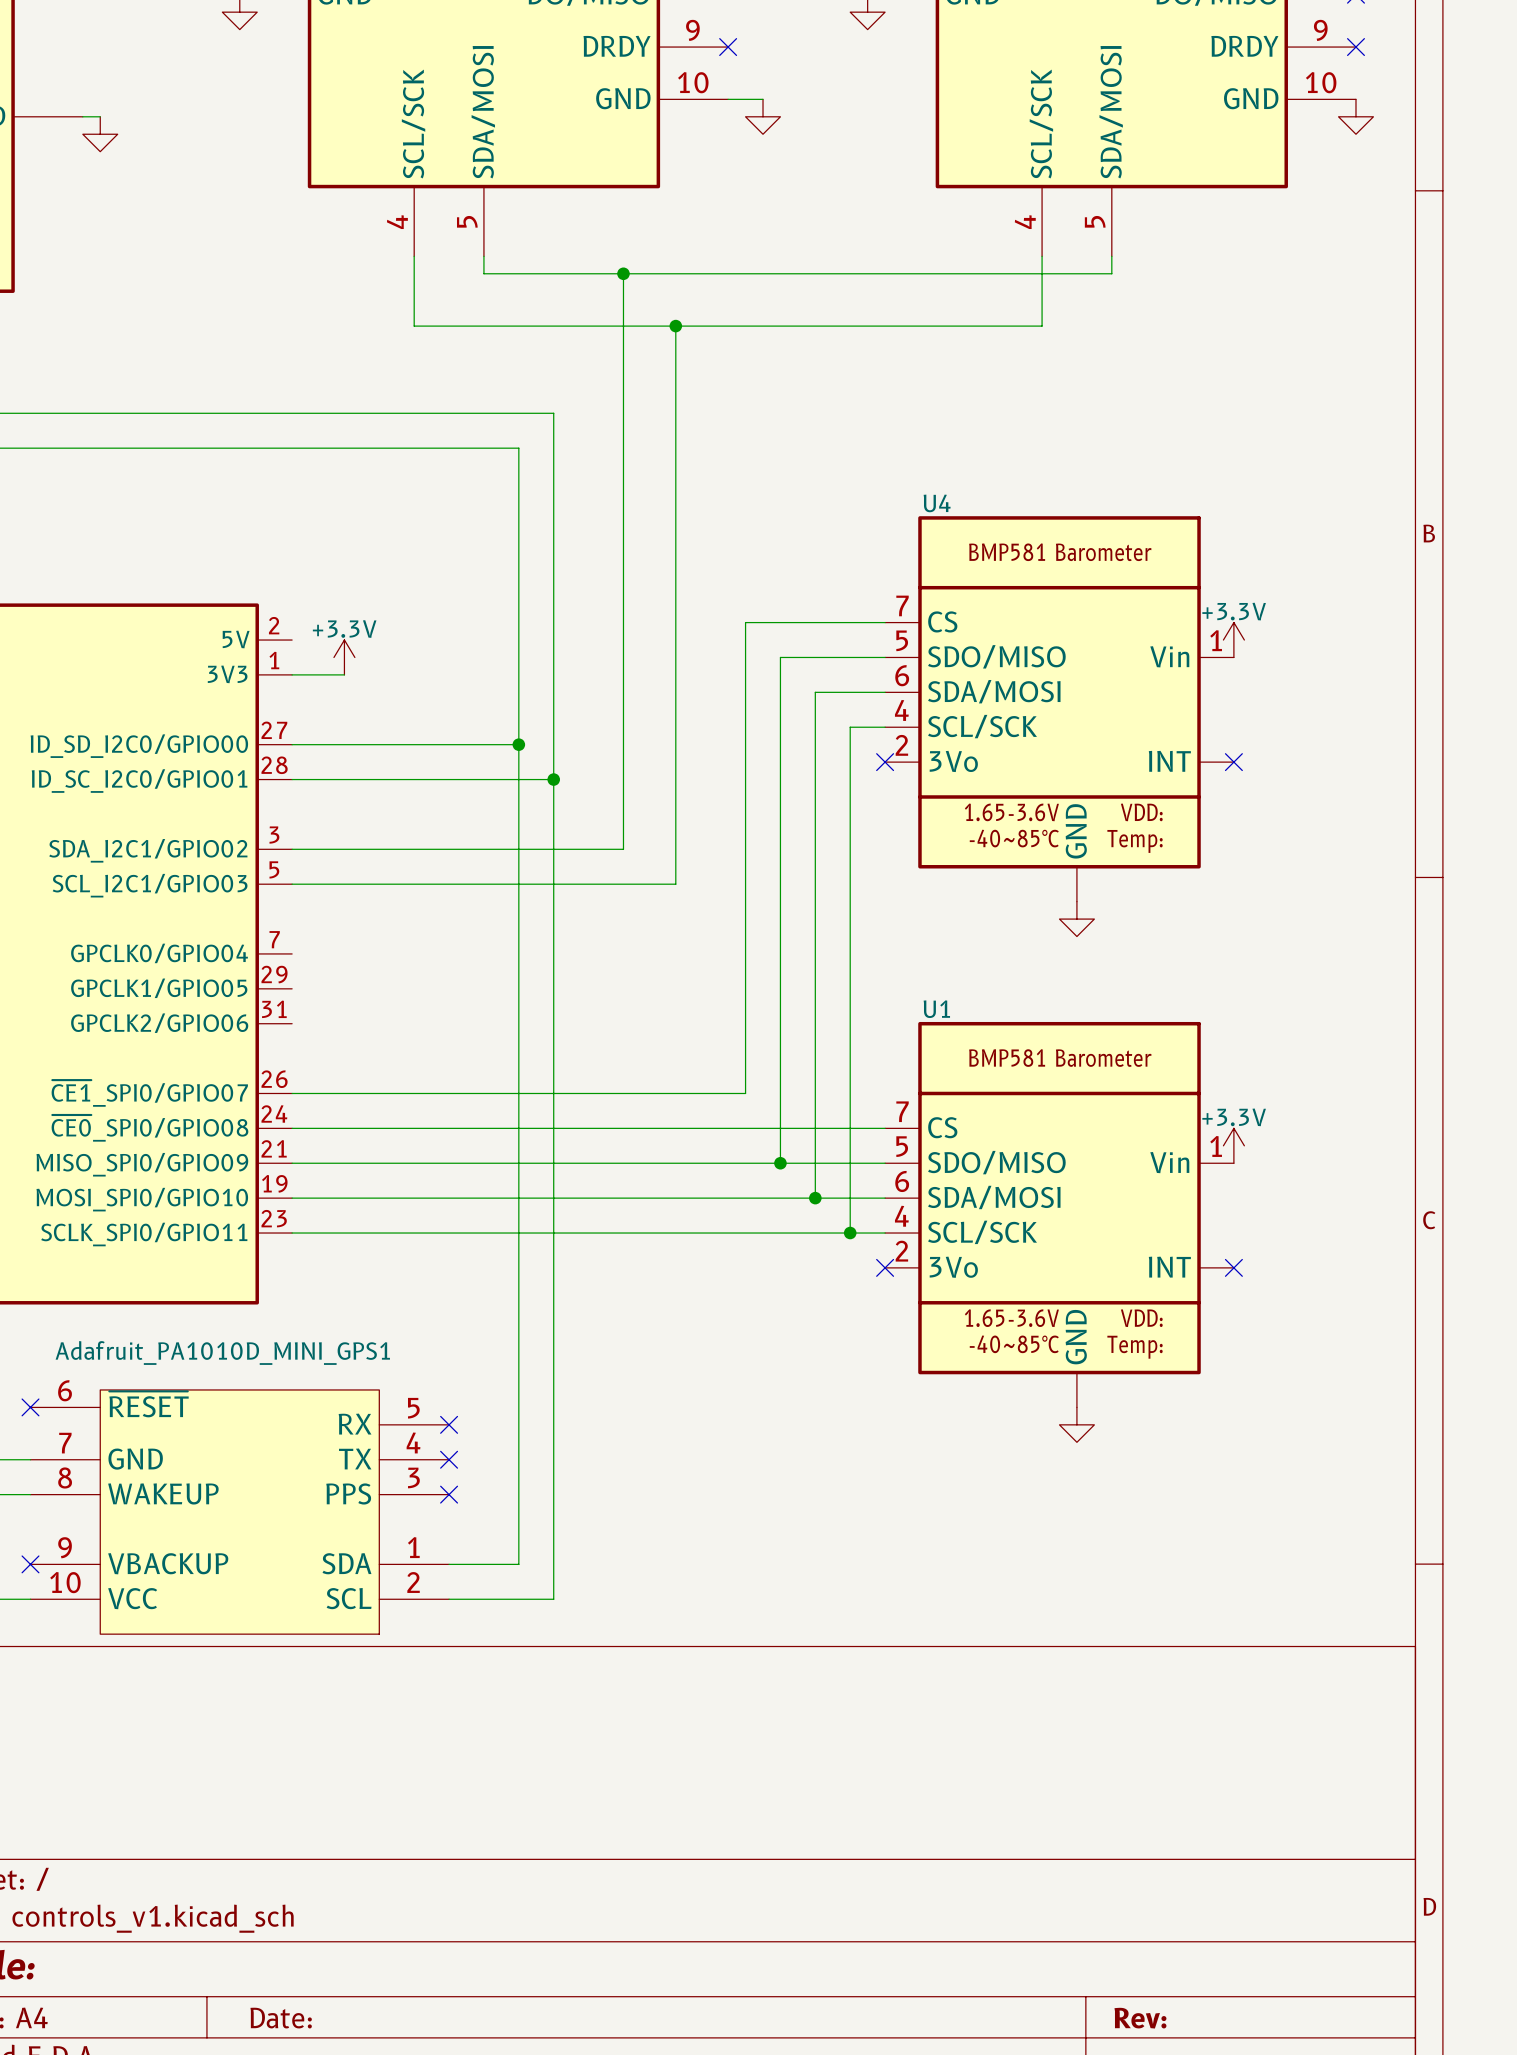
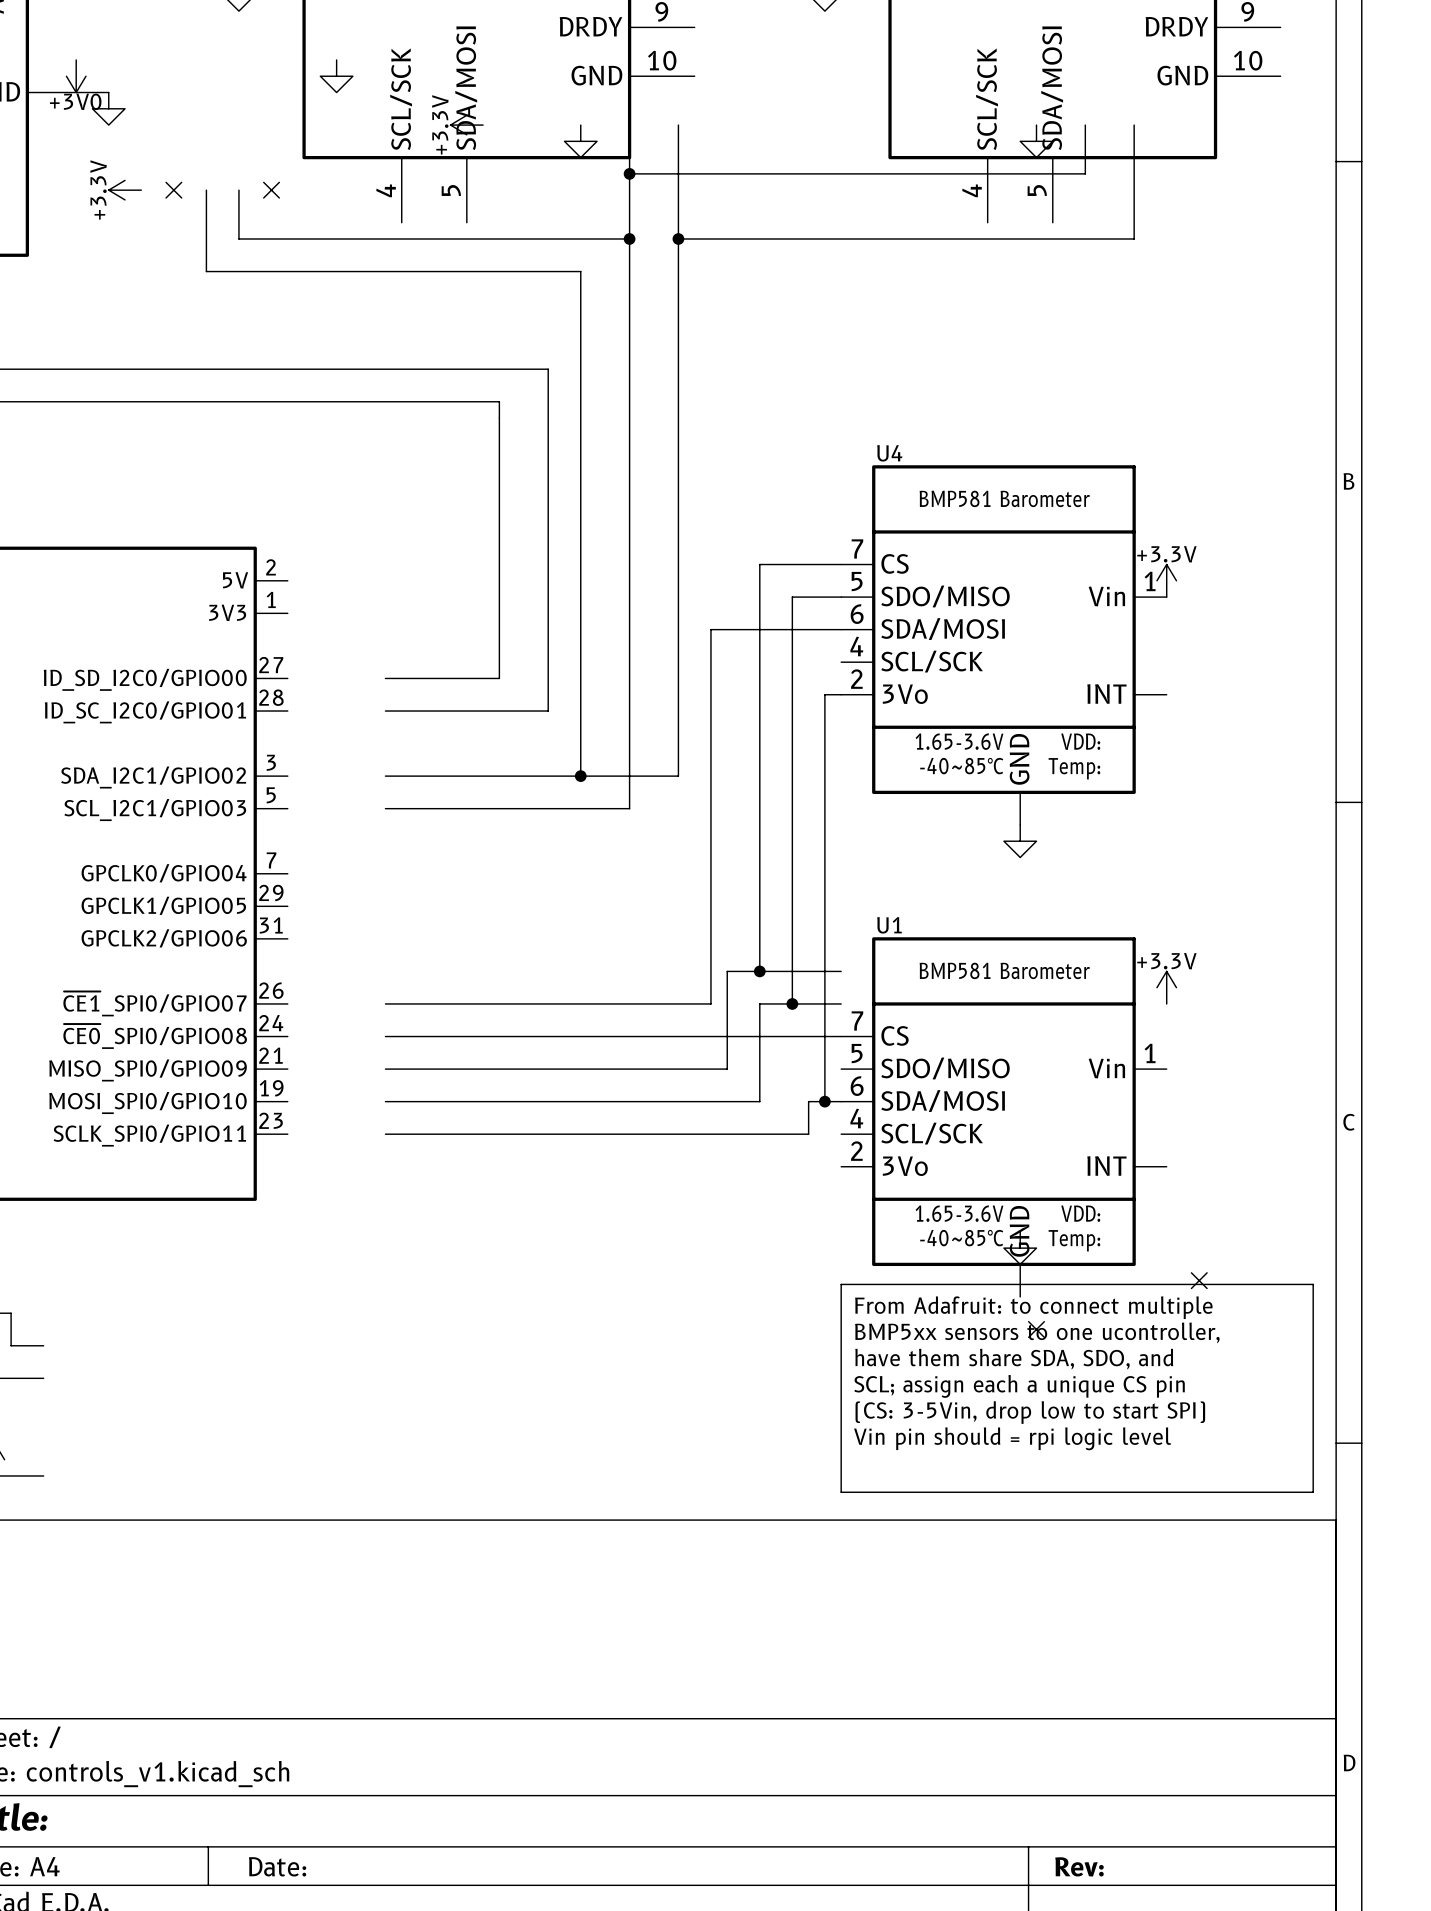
no-connect mark: (728, 47) -> none
no-connect mark: (1355, 47) -> none
power symbol: none -> +3V0 (76, 76)
power symbol: none -> (336, 76)
wire: (728, 99) (763, 99) -> none
power symbol position: (763, 116) -> (580, 141)
power symbol: (1355, 116) -> none
power symbol: none -> +3.3V (466, 125)
wire: none -> (1085, 125) (1085, 173) (629, 173)
power symbol: none -> (1036, 141)
junction: none -> (629, 173)
power symbol: none -> +3.3V (125, 190)
no-connect mark: none -> (173, 190)
wire: none -> (206, 190) (206, 271) (580, 271) (580, 776)
no-connect mark: none -> (271, 190)
wire: (414, 256) (414, 326) (1042, 326) (1042, 256) -> none
wire: (483, 256) (483, 273) -> (238, 190) (238, 239) (466, 239)
wire: (1111, 256) (1111, 273) -> (1134, 125) (1134, 239) (1052, 239)
wire: (623, 273) (623, 849) -> (678, 125) (678, 776) (597, 776)
junction: (623, 273) -> none
wire: (658, 273) (710, 273) -> none
junction: none -> (629, 239)
junction: none -> (678, 239)
wire: (675, 326) (675, 884) (658, 884) -> (629, 125) (629, 808)
junction: (675, 326) -> none
wire: (553, 413) (553, 1599) (449, 1599) -> (531, 369) (548, 369) (548, 711) (531, 711)
wire: (797, 622) (745, 622) (745, 692) -> (776, 629) (710, 629)
wire: none -> (759, 564) (759, 971)
power symbol: +3.3V (344, 657) -> none
wire: (832, 657) (780, 657) (780, 1163) -> (792, 597) (792, 1003)
wire: (292, 674) (344, 674) -> none
wire: (815, 692) (815, 1198) -> none
wire: (885, 727) (850, 727) (850, 1198) (797, 1198) -> (841, 1003) (759, 1003) (759, 1101)
wire: (292, 744) (396, 744) -> none
wire: (518, 744) (518, 1564) (449, 1564) -> none
junction: (518, 744) -> none
wire: none -> (841, 694) (824, 694) (824, 1101)
no-connect mark: (885, 762) -> none
no-connect mark: (1233, 762) -> none
wire: (292, 779) (396, 779) -> none
junction: (553, 779) -> none
wire: (292, 849) (396, 849) -> none
junction: none -> (580, 776)
wire: (292, 884) (396, 884) -> none
junction: none -> (759, 971)
wire: (292, 1093) (396, 1093) -> none
junction: none -> (792, 1003)
wire: (292, 1128) (396, 1128) -> none
power symbol position: +3.3V (1233, 1145) -> +3.3V (1166, 987)
wire: (292, 1163) (396, 1163) -> none
wire: (763, 1163) (885, 1163) -> (727, 1069) (727, 971) (841, 971)
junction: (780, 1163) -> none
wire: (292, 1198) (396, 1198) -> none
junction: (815, 1198) -> none
junction: none -> (824, 1101)
wire: (292, 1233) (396, 1233) -> none
wire: (850, 1233) (885, 1233) -> none
junction: (850, 1233) -> none
no-connect mark: (885, 1267) -> none
no-connect mark: (1233, 1267) -> none
no-connect mark: none -> (1199, 1280)
line: none -> (841, 1284) (1313, 1284) (1313, 1492) (841, 1492) (841, 1284)
no-connect mark: (30, 1407) -> none
text: none -> From Adafruit: to connect multiple (1033, 1307)
no-connect mark: (449, 1424) -> none
power symbol position: (1076, 1424) -> (1020, 1248)
no-connect mark: none -> (1036, 1329)
text: none -> BMP5xx sensors to one ucontroller, (1037, 1332)
no-connect mark: (449, 1459) -> none
text: none -> have them share SDA, SDO, and (1014, 1359)
no-connect mark: (449, 1494) -> none
text: none -> SCL; assign each a unique CS pin (1019, 1386)
Adafruit_PA1010D_MINI_GPS1: (239, 1512) -> none
text: none -> (CS: 3-5Vin, drop low to start SPI) (1030, 1412)
text: none -> Vin pin should = rpi logic level (1012, 1438)
no-connect mark: (30, 1564) -> none

